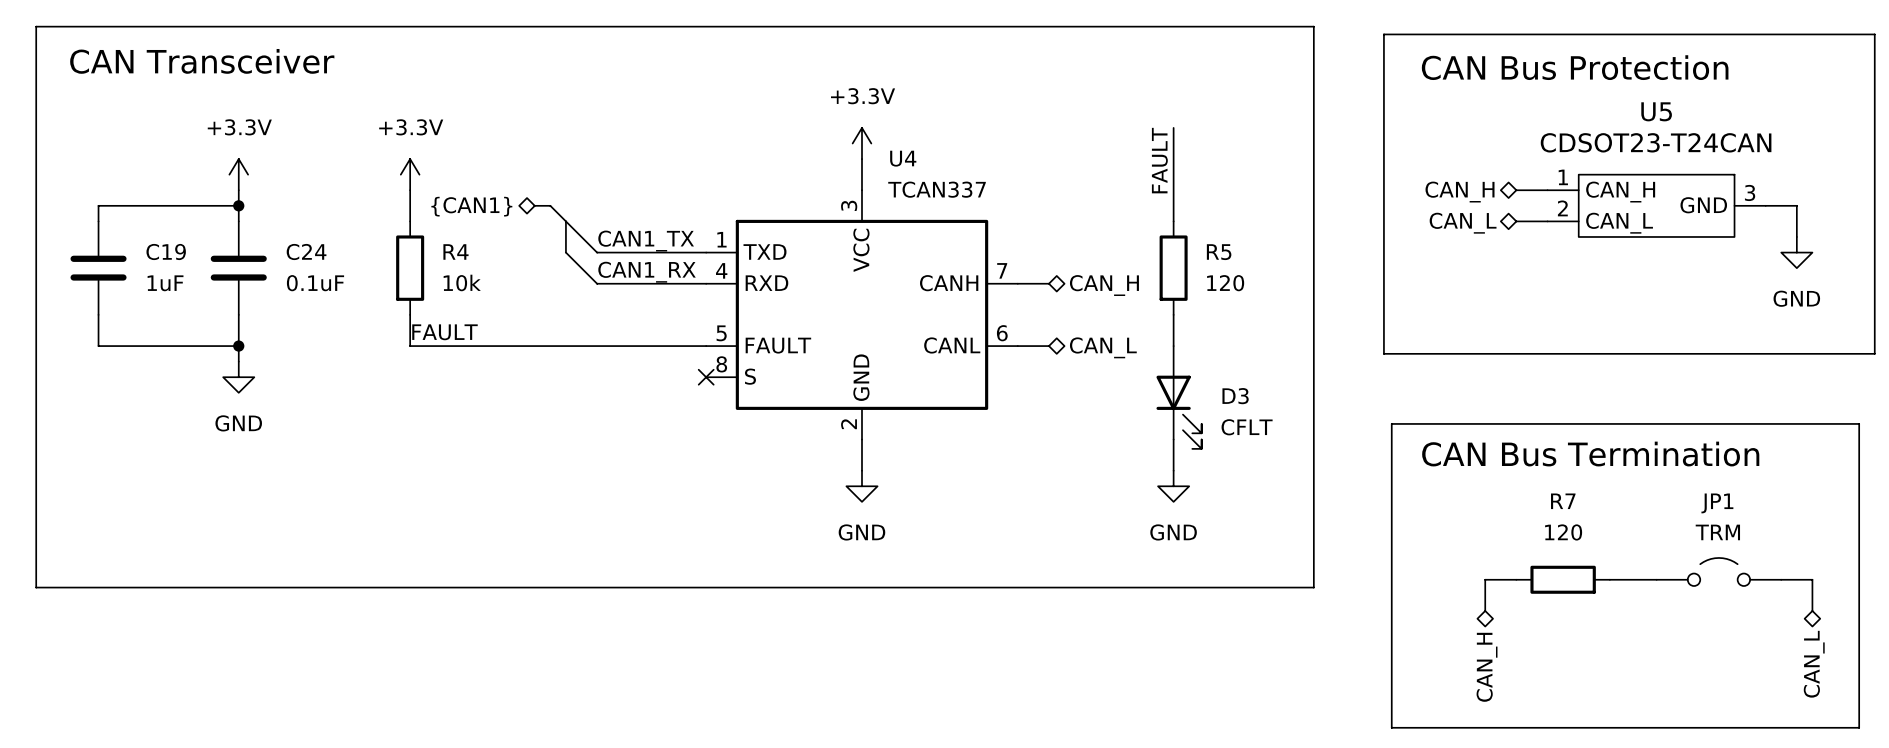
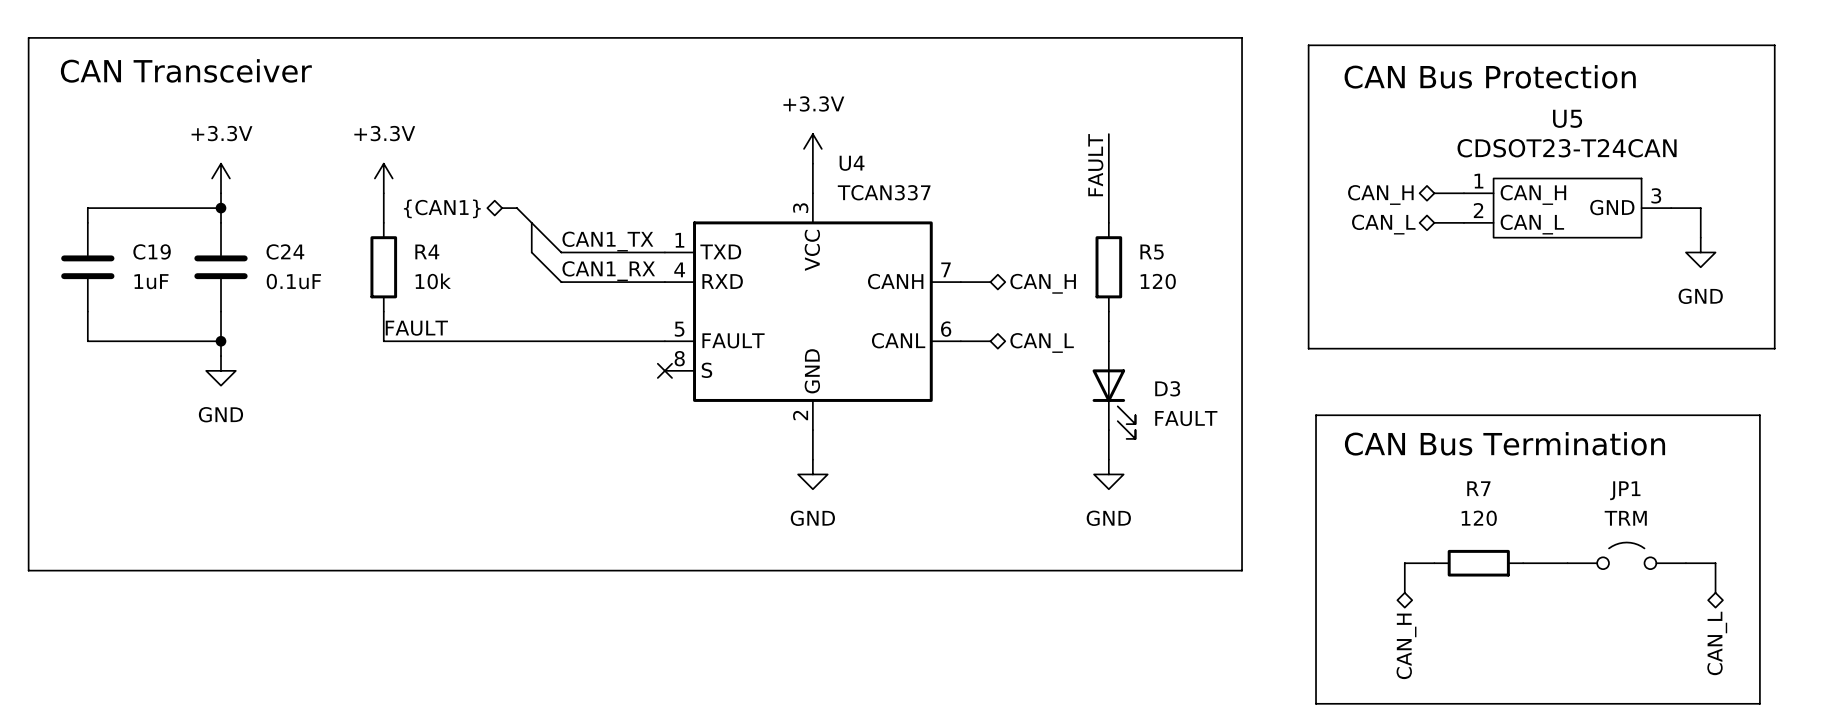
D3 value: CFLT (1247, 427) -> FAULT (1186, 418)

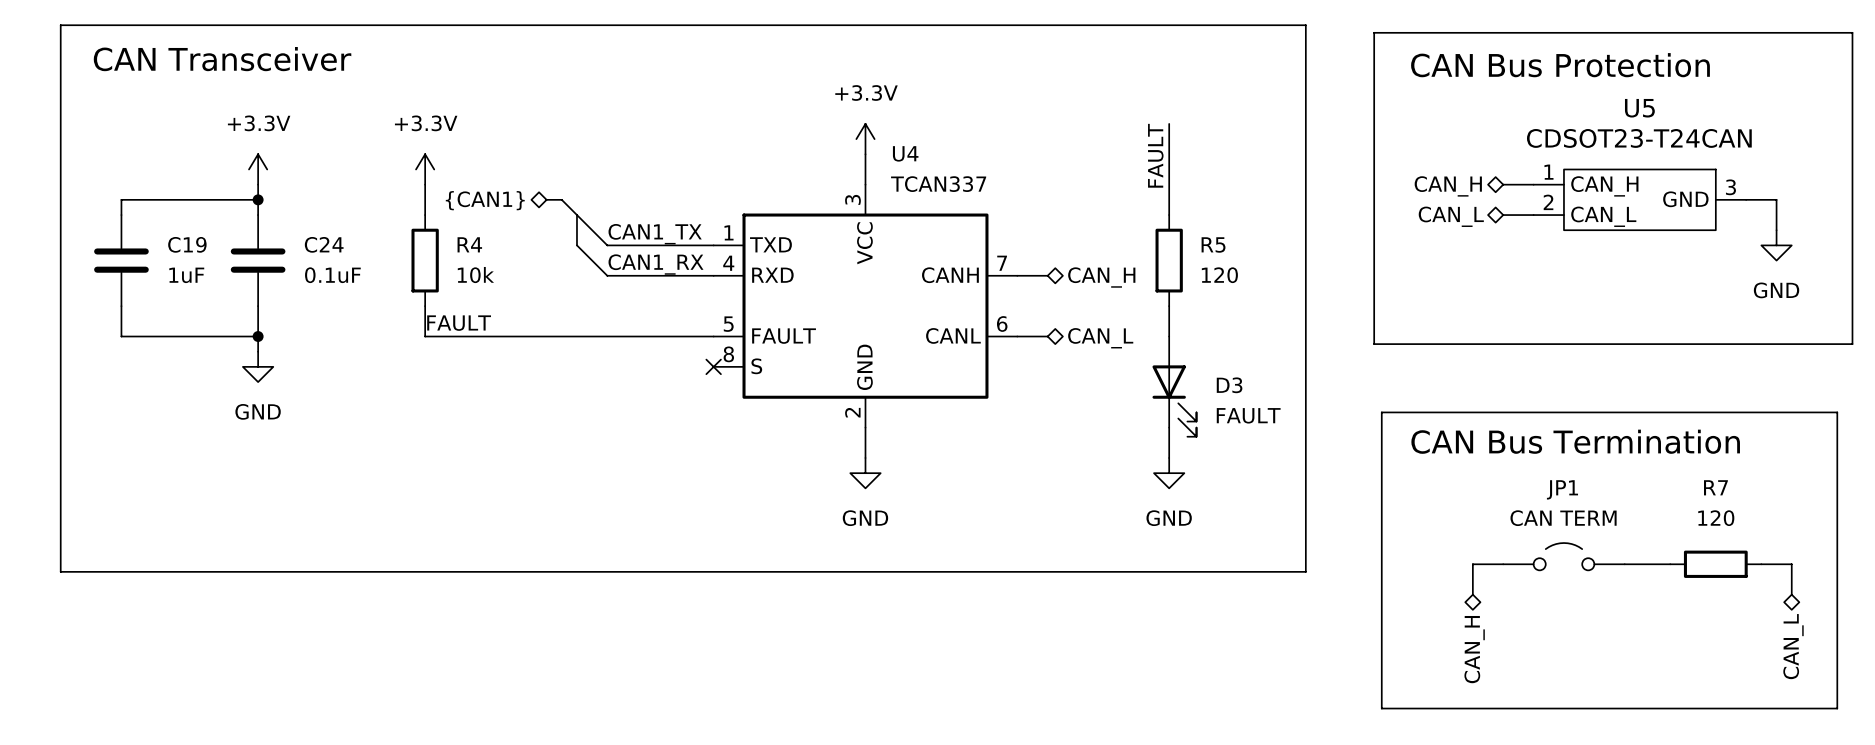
JP1 value: TRM (1625, 518) -> CAN TERM (1563, 518)
JP1 position: (1626, 555) -> (1563, 556)
R7 position: (1478, 563) -> (1715, 564)

